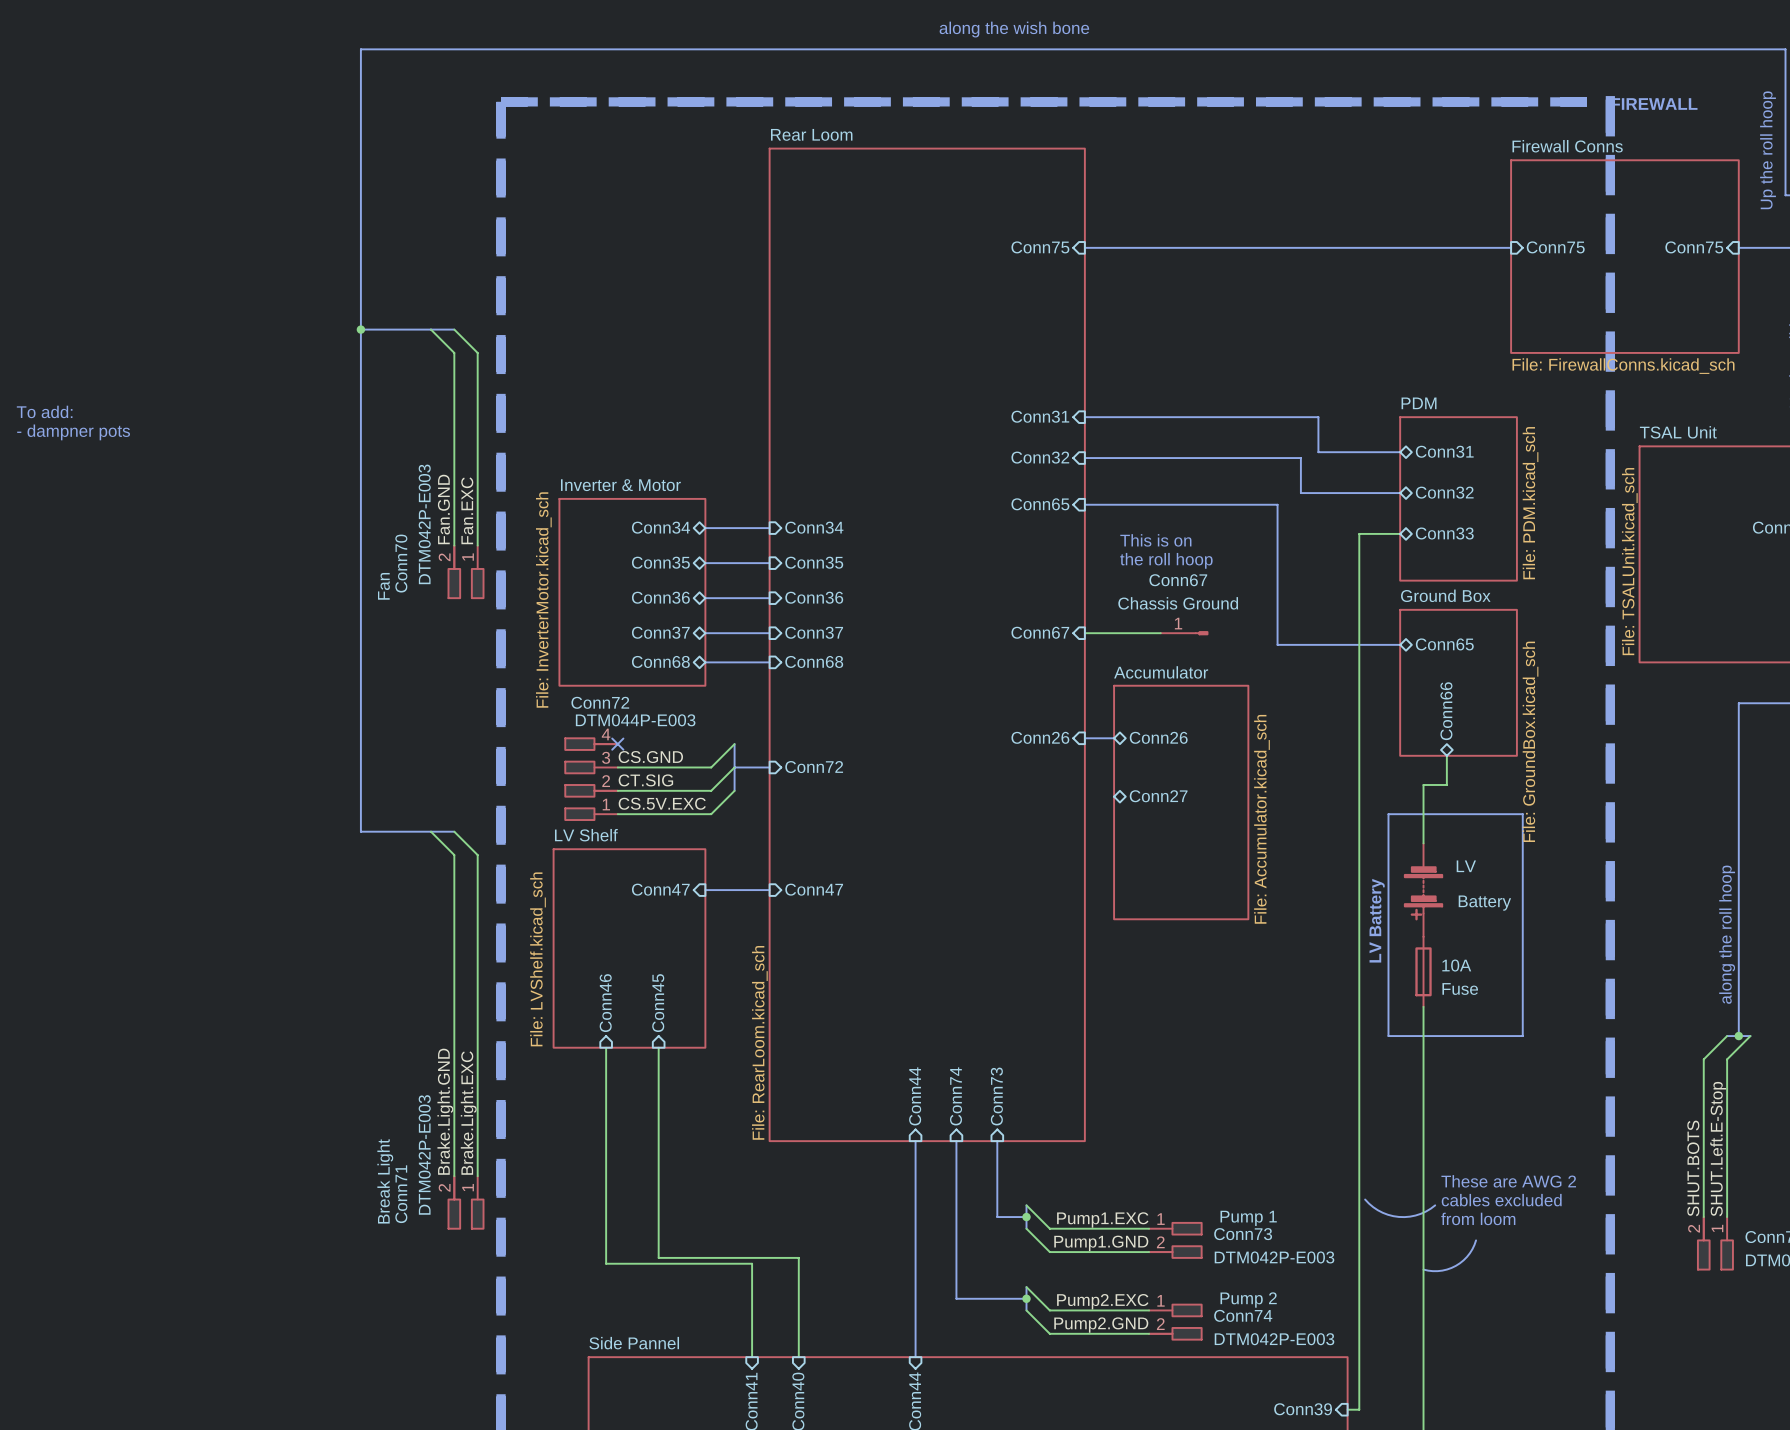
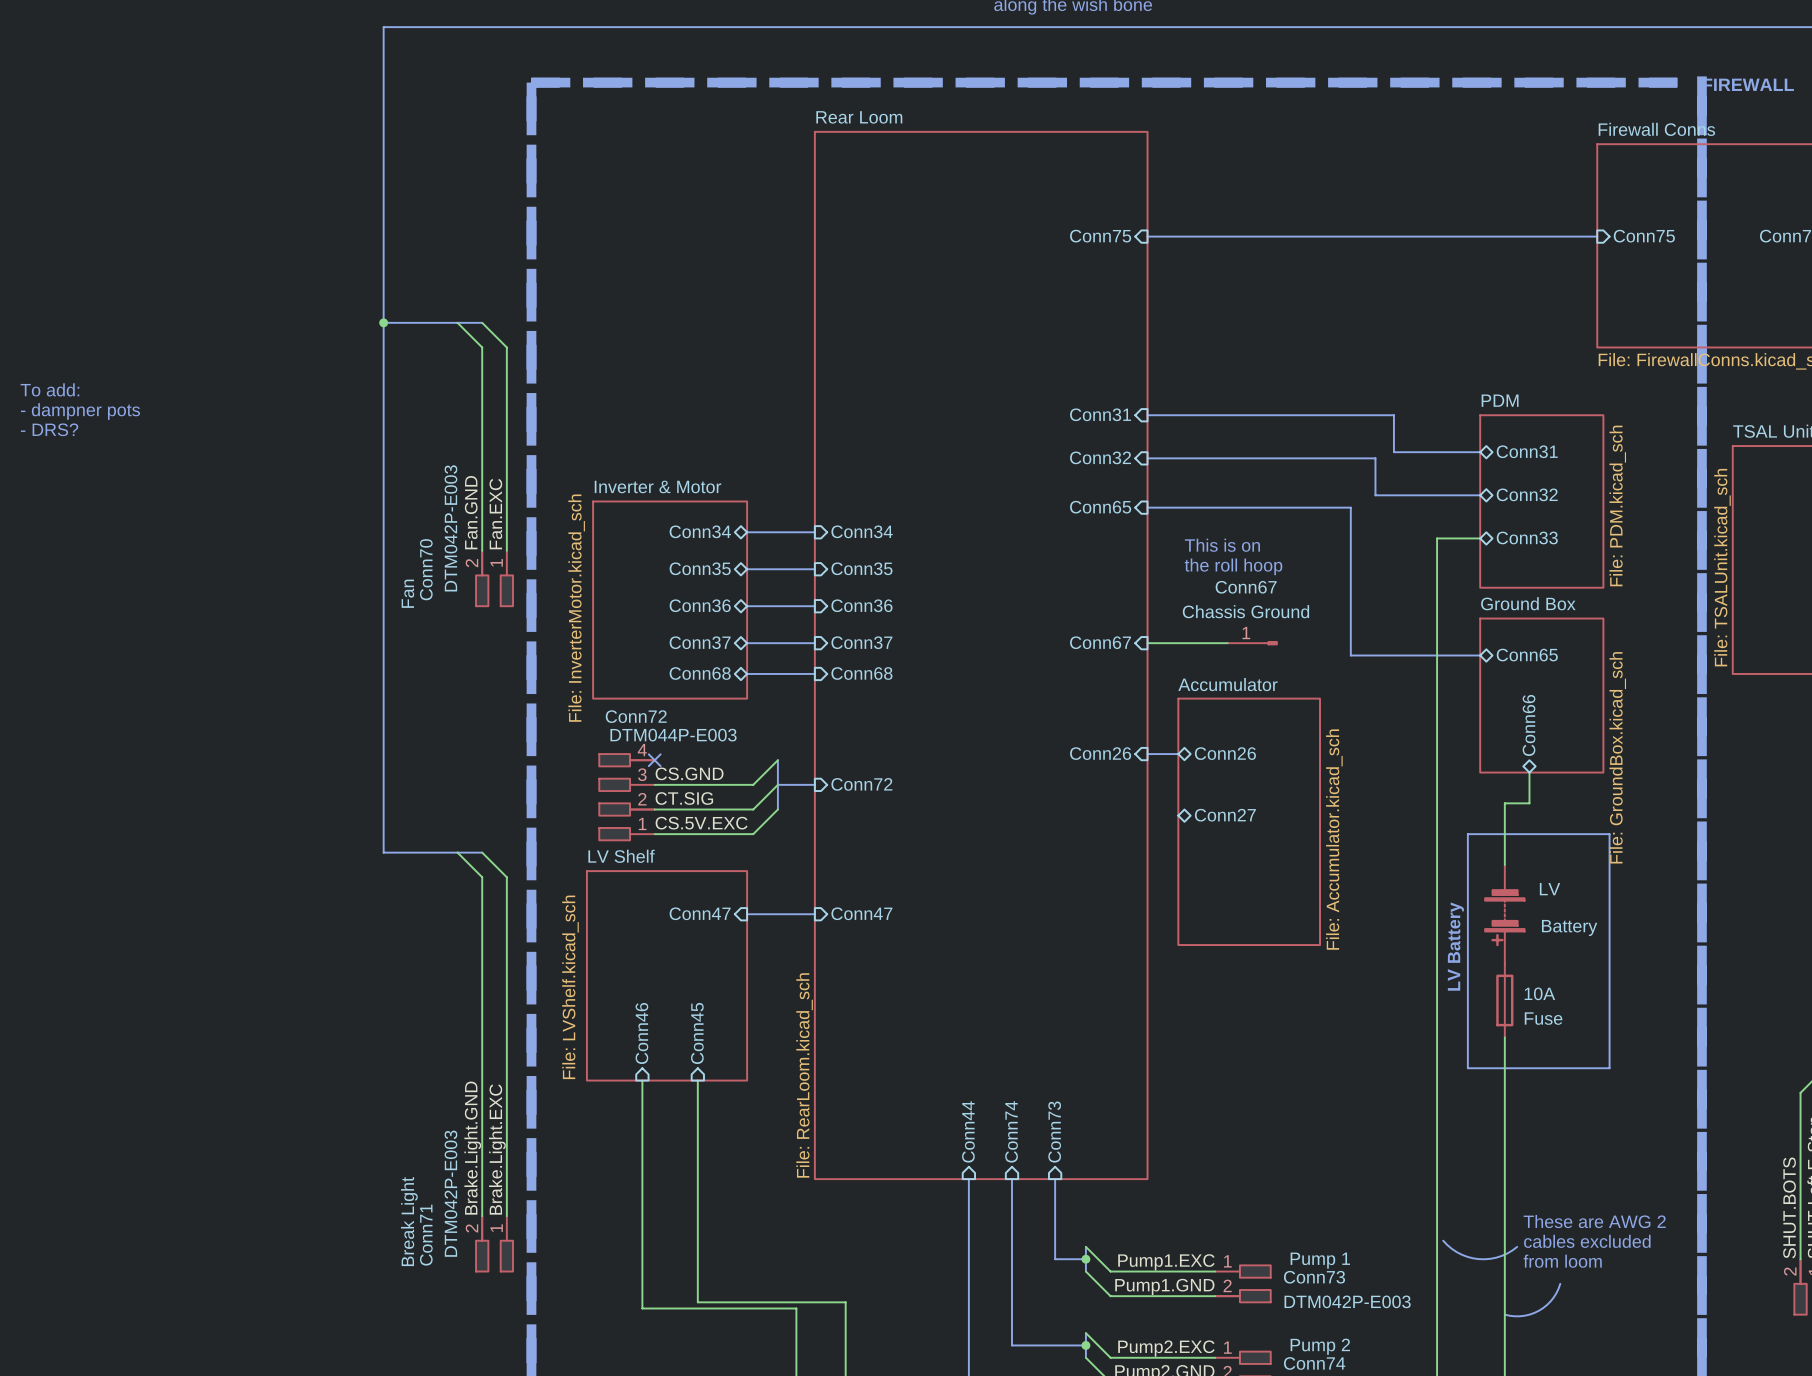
text: none -> To add: (49, 389)
text: To add: (44, 411) -> - dampner pots (80, 411)
text: - dampner pots (73, 432) -> - DRS? (49, 429)

